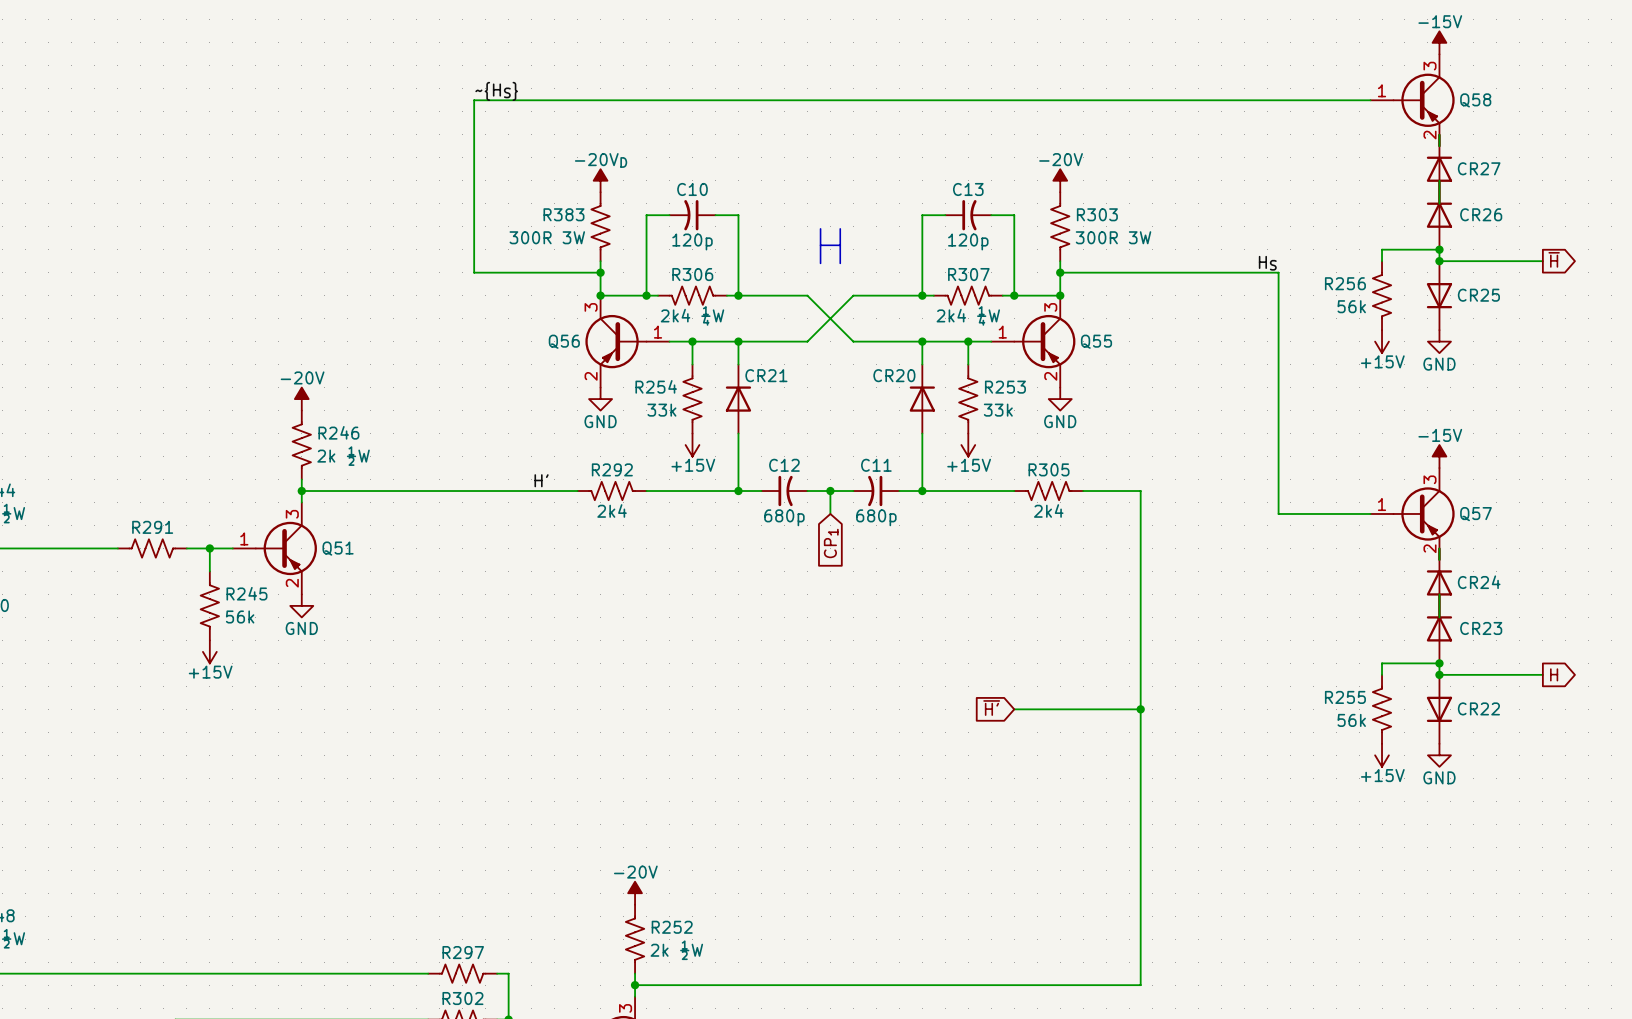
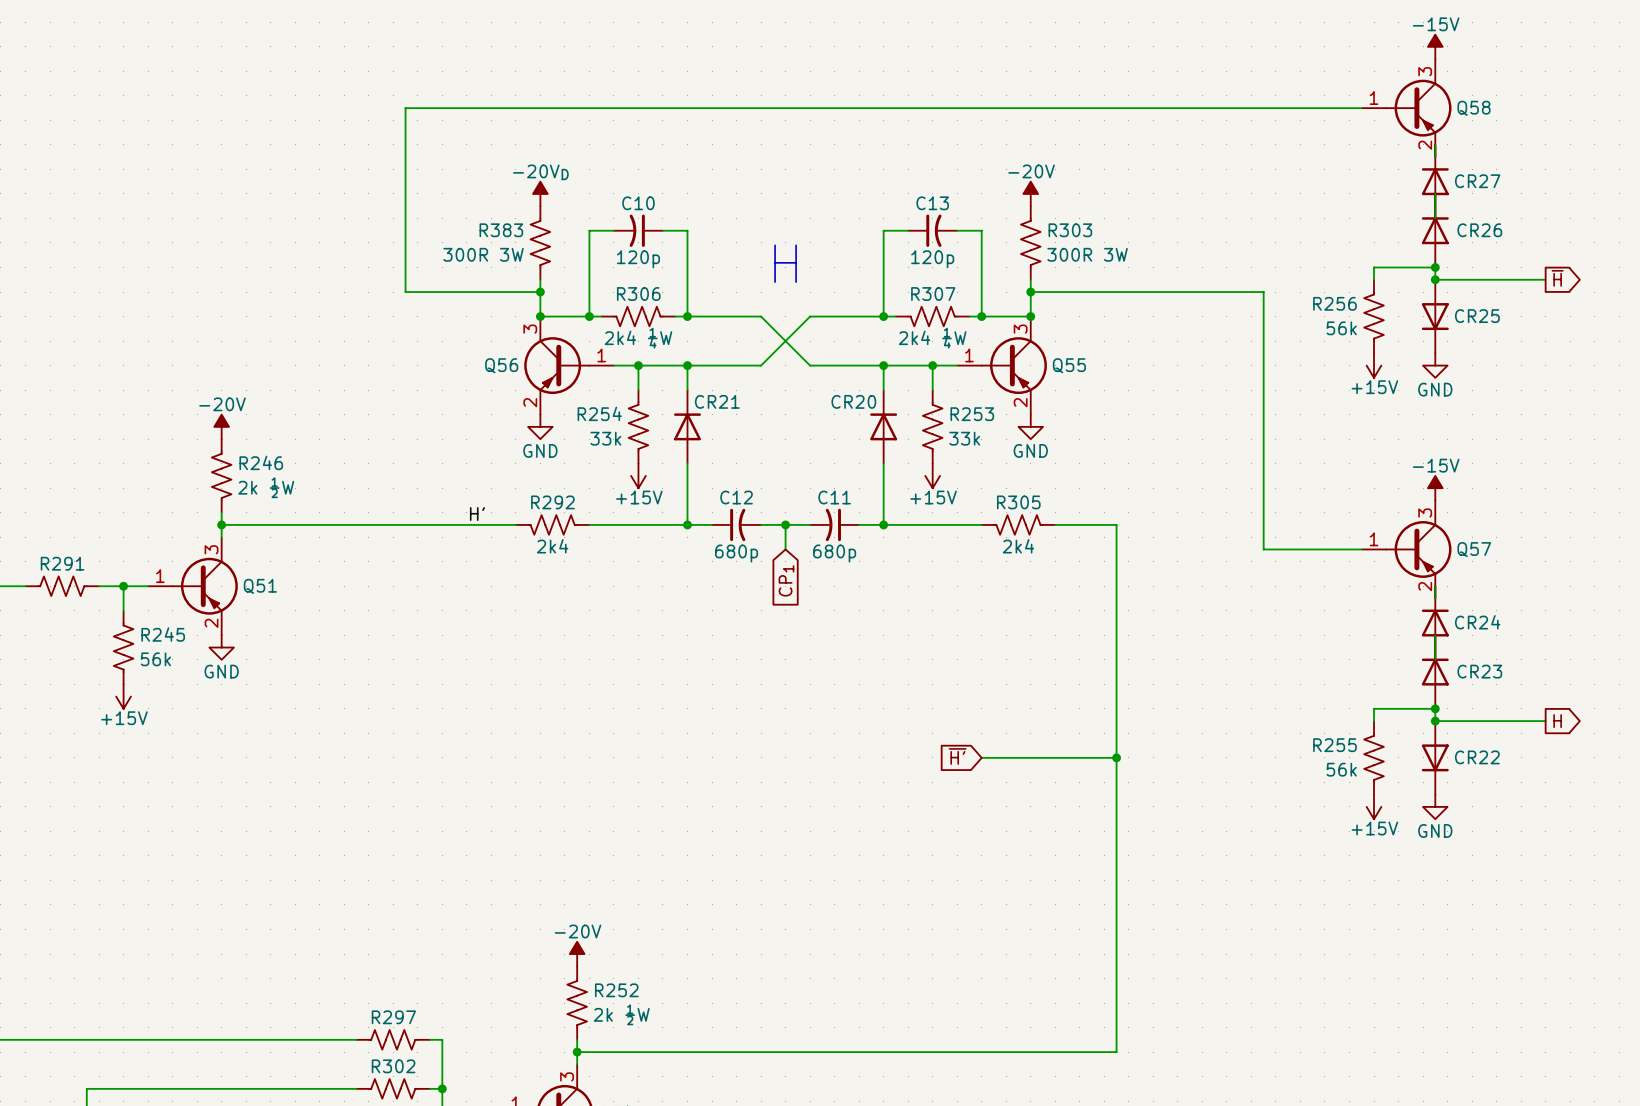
label: ~{HS} (496, 91) -> none
label: HS (1267, 263) -> none

